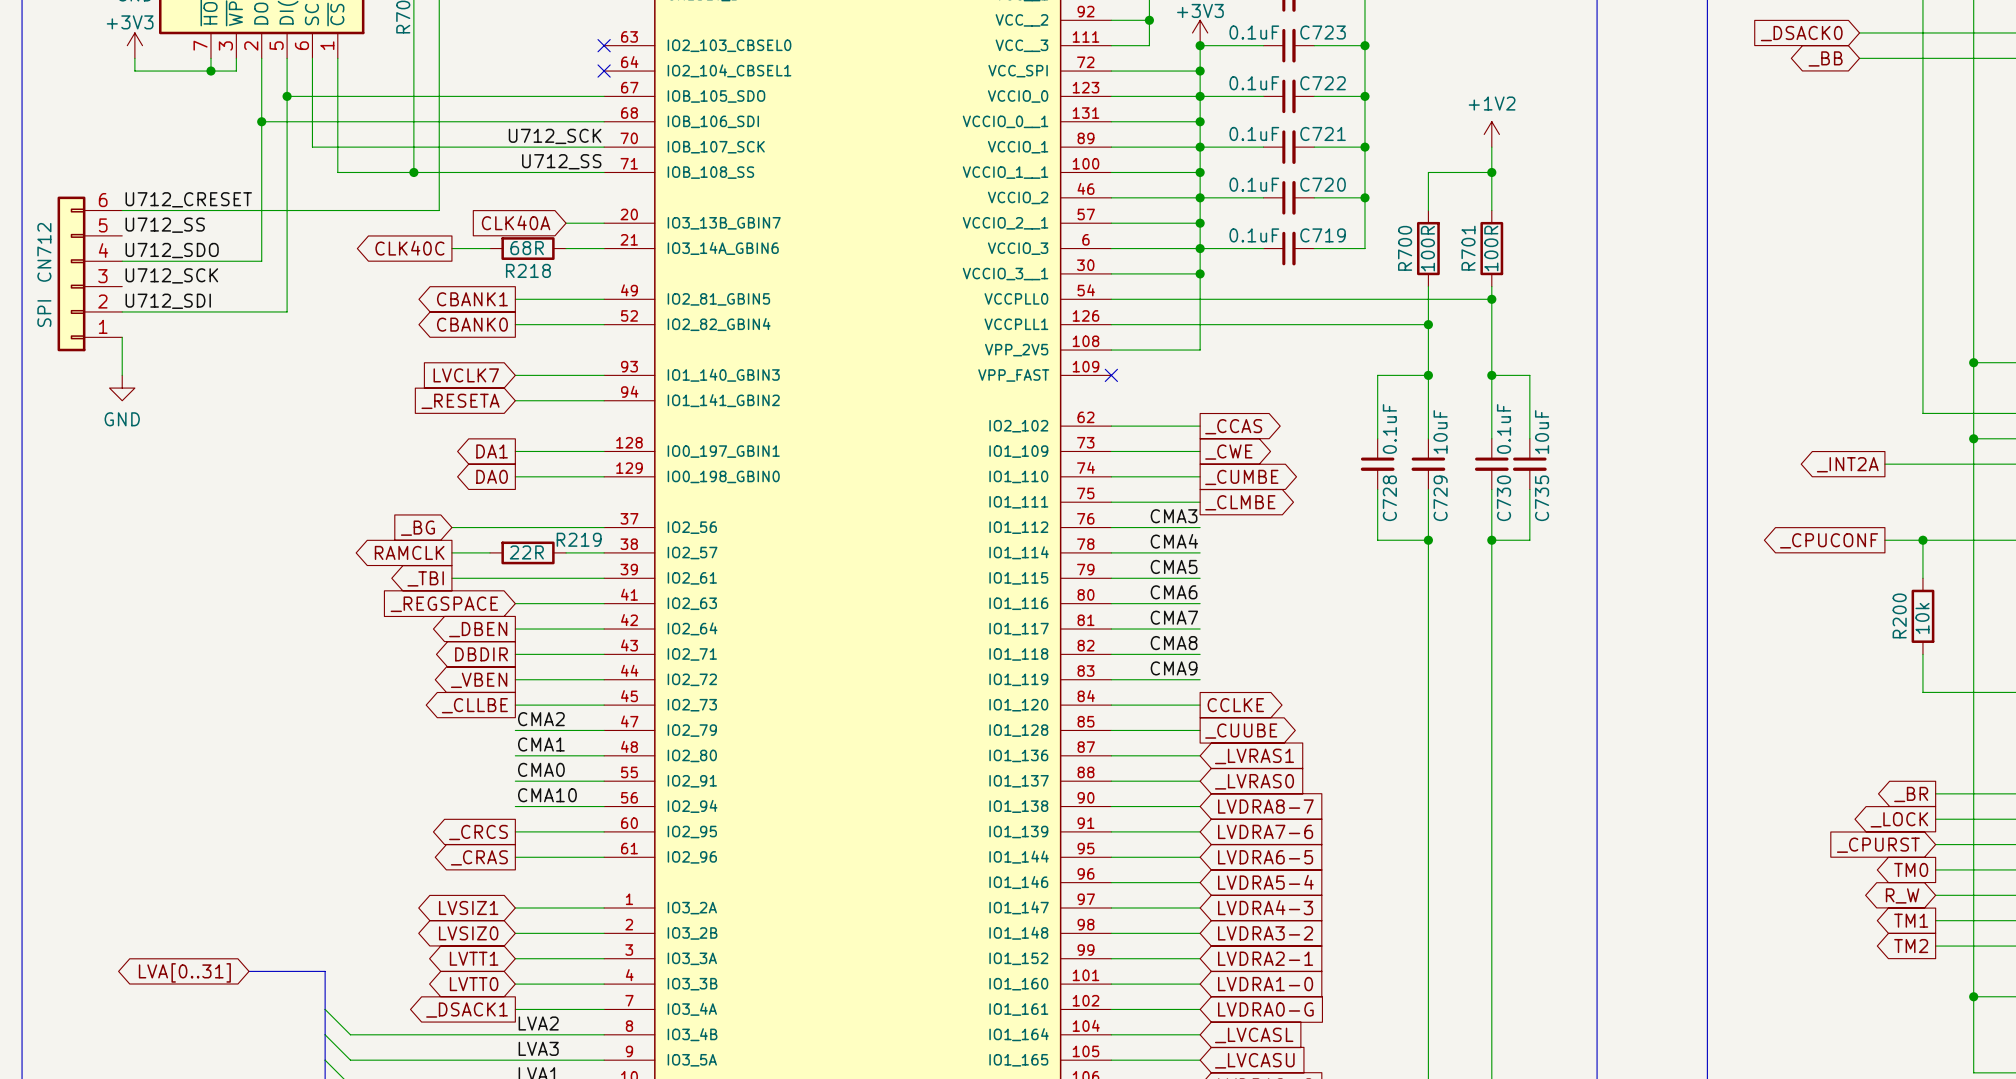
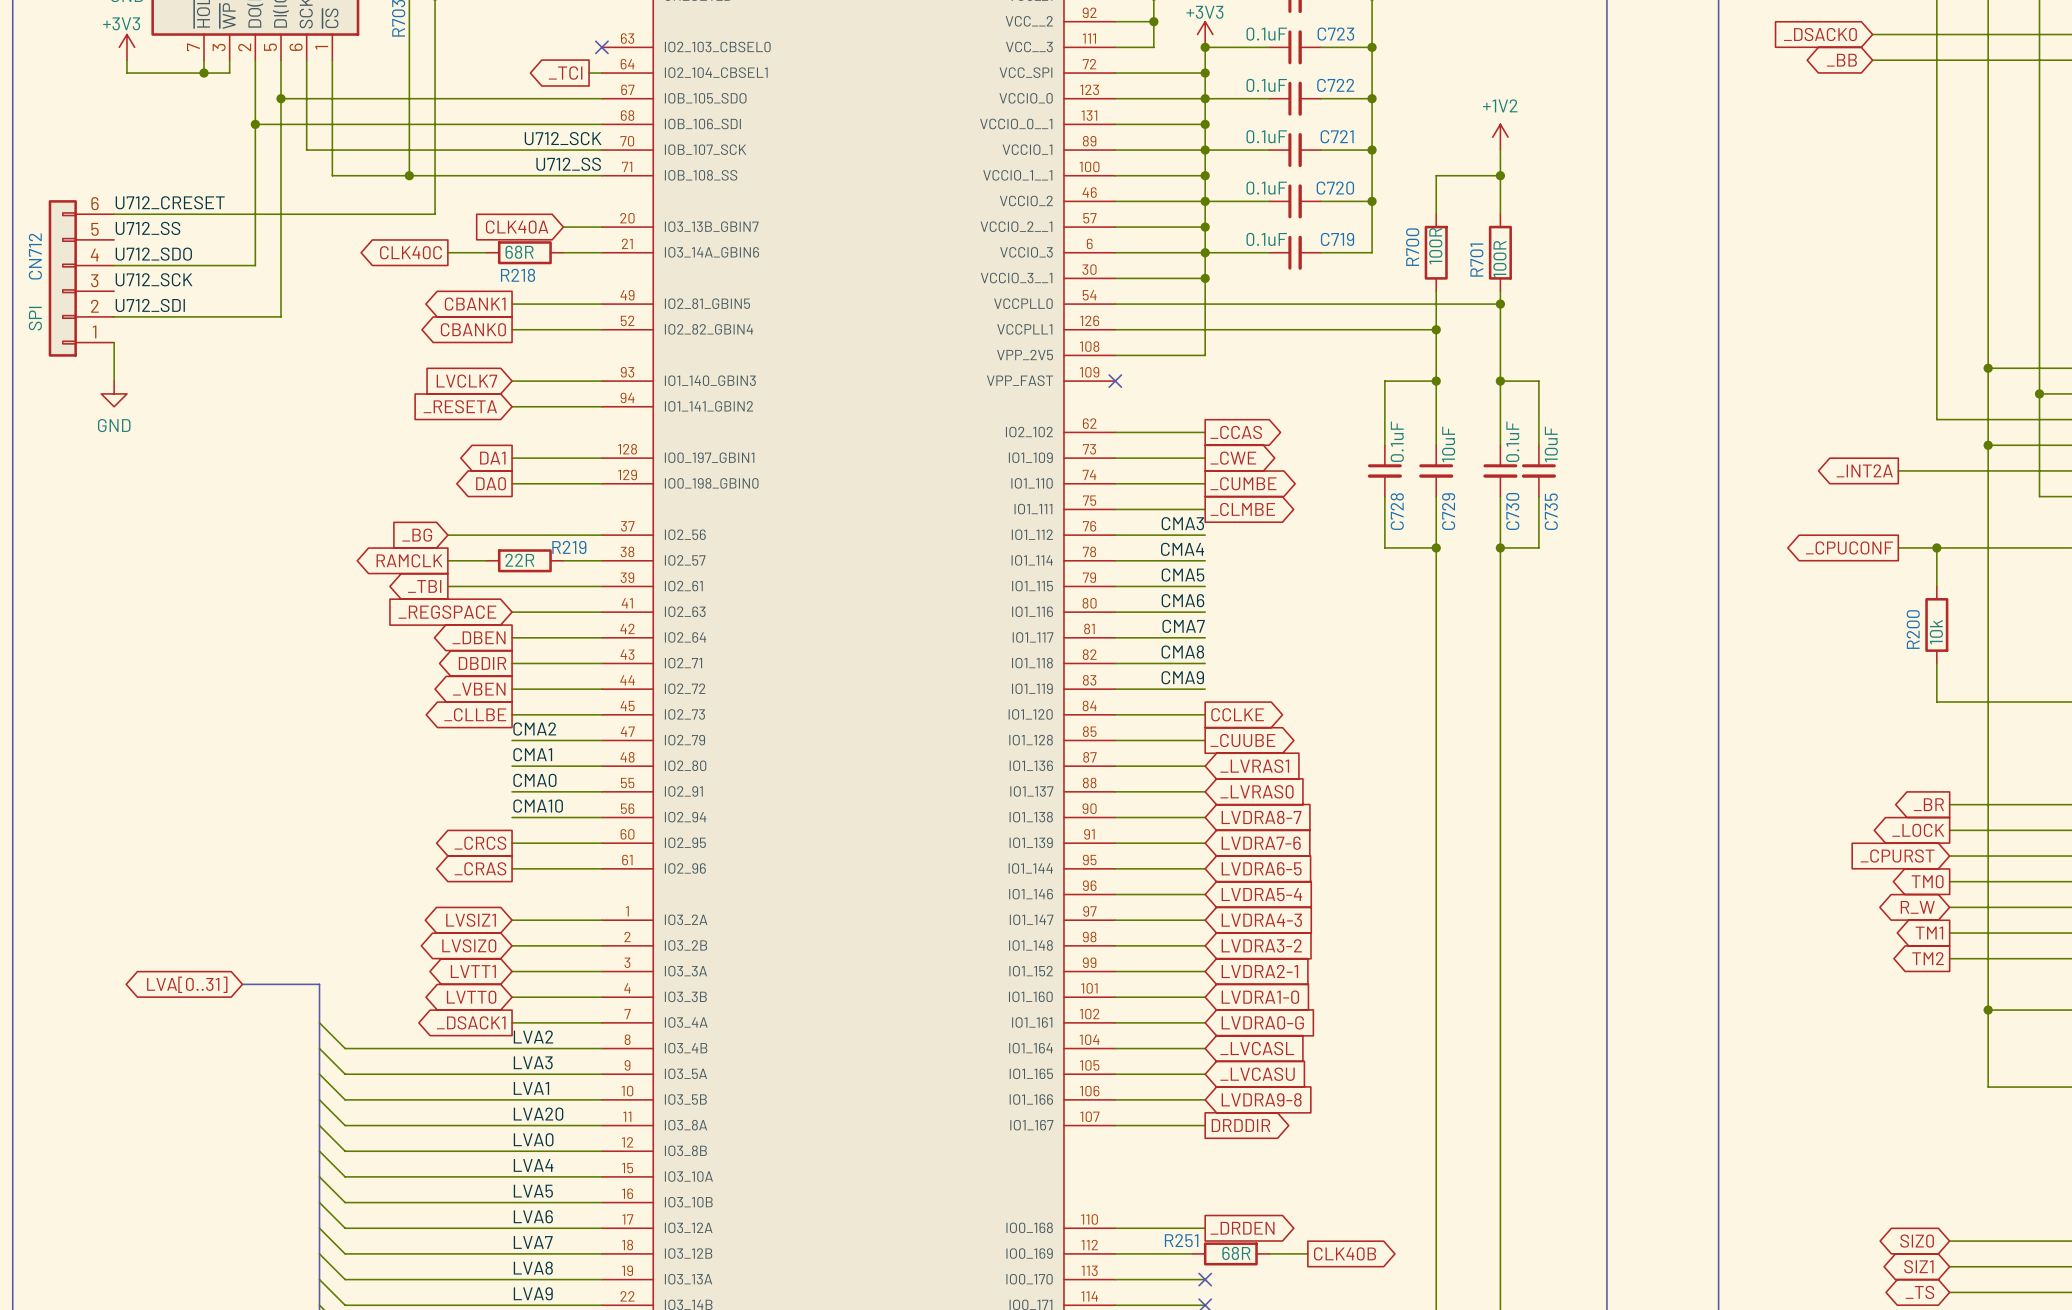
global label: none -> _TCI (565, 73)
wire: none -> (589, 73) (601, 73)
no-connect mark: (604, 71) -> none

